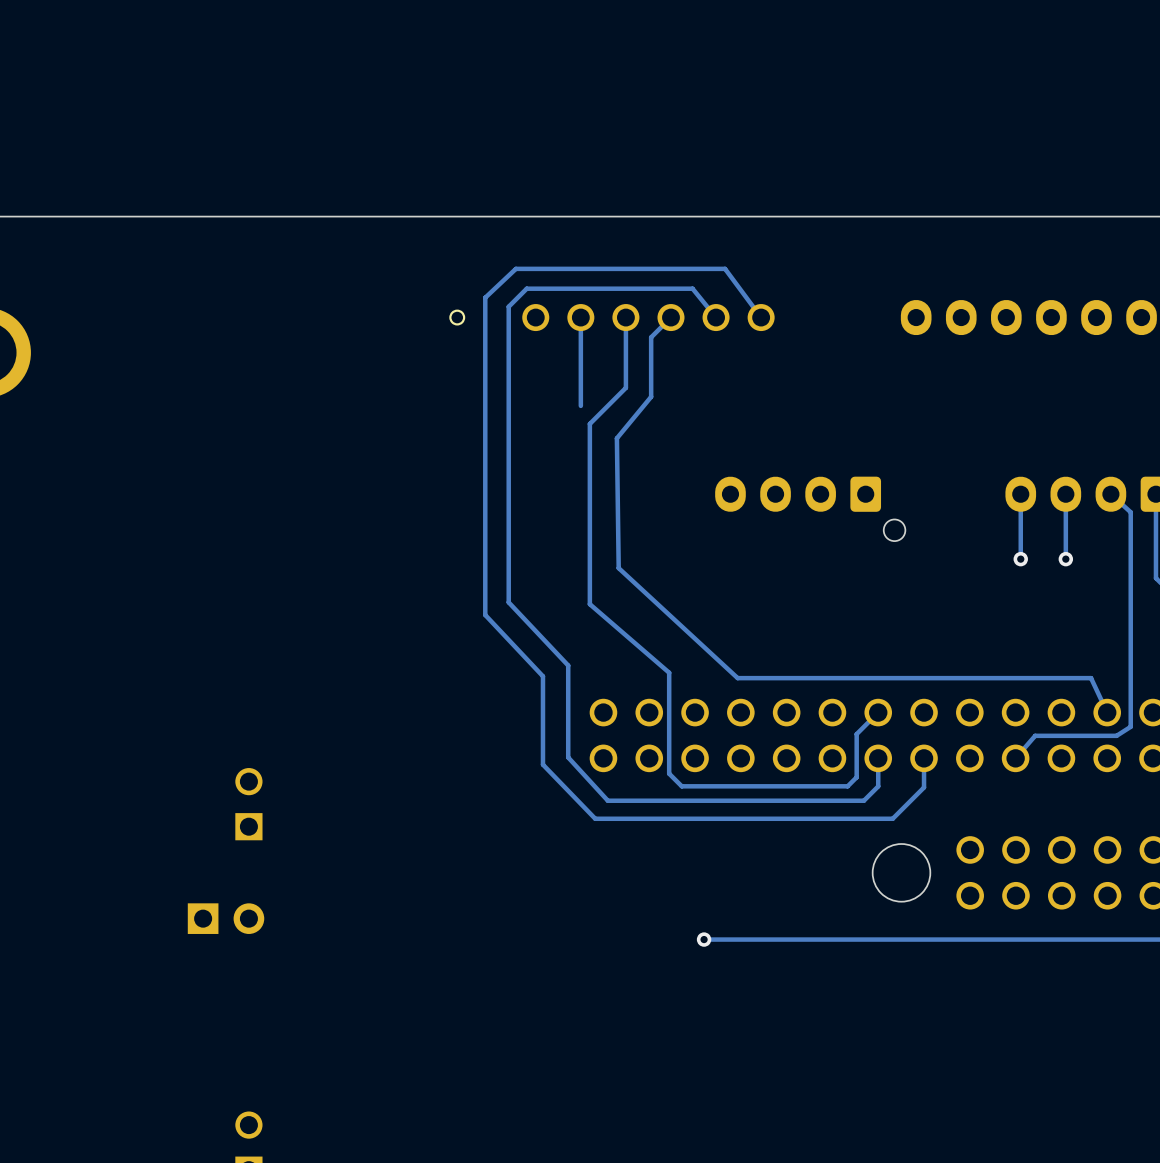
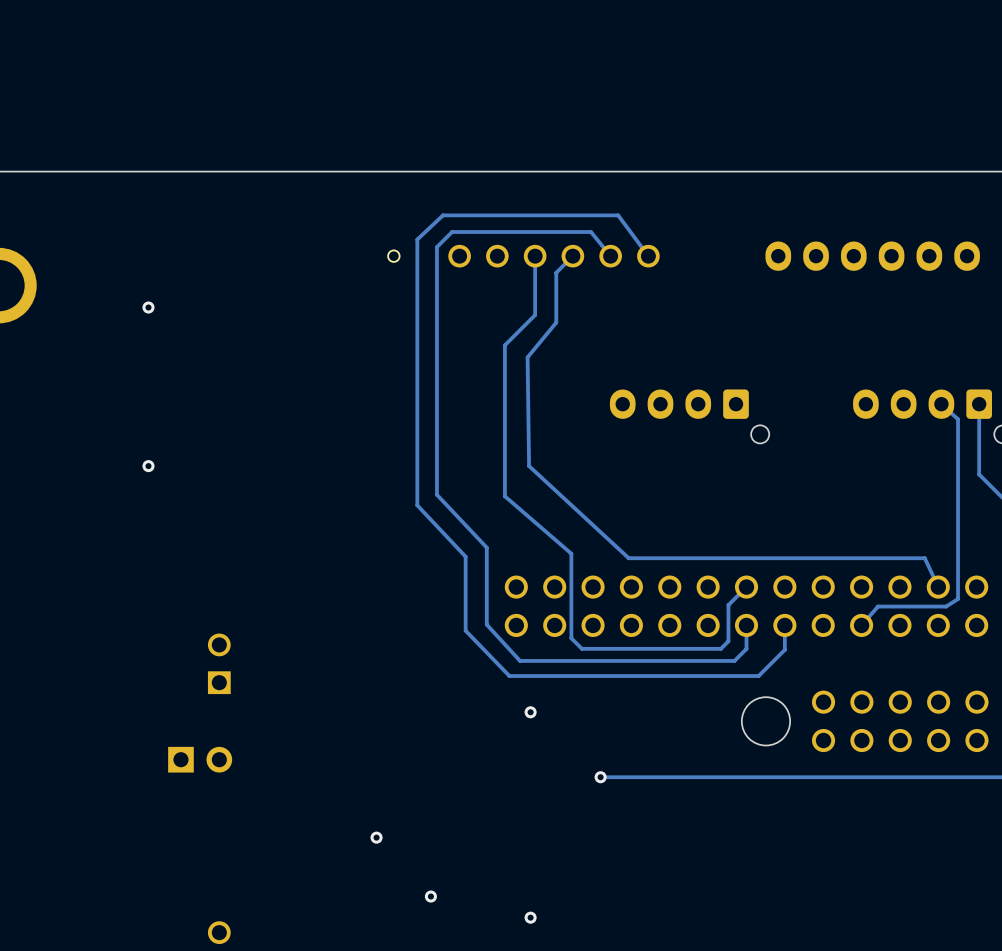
track: (580, 315) (580, 405) -> none
via: none -> (148, 307)
track: (1020, 494) (1020, 559) -> none
track: (1065, 494) (1065, 559) -> none
via: (1020, 559) -> none
via: (1065, 559) -> none
via: none -> (148, 466)
via: none -> (530, 712)
via: none -> (376, 837)
via: none -> (430, 896)
via: none -> (530, 917)

